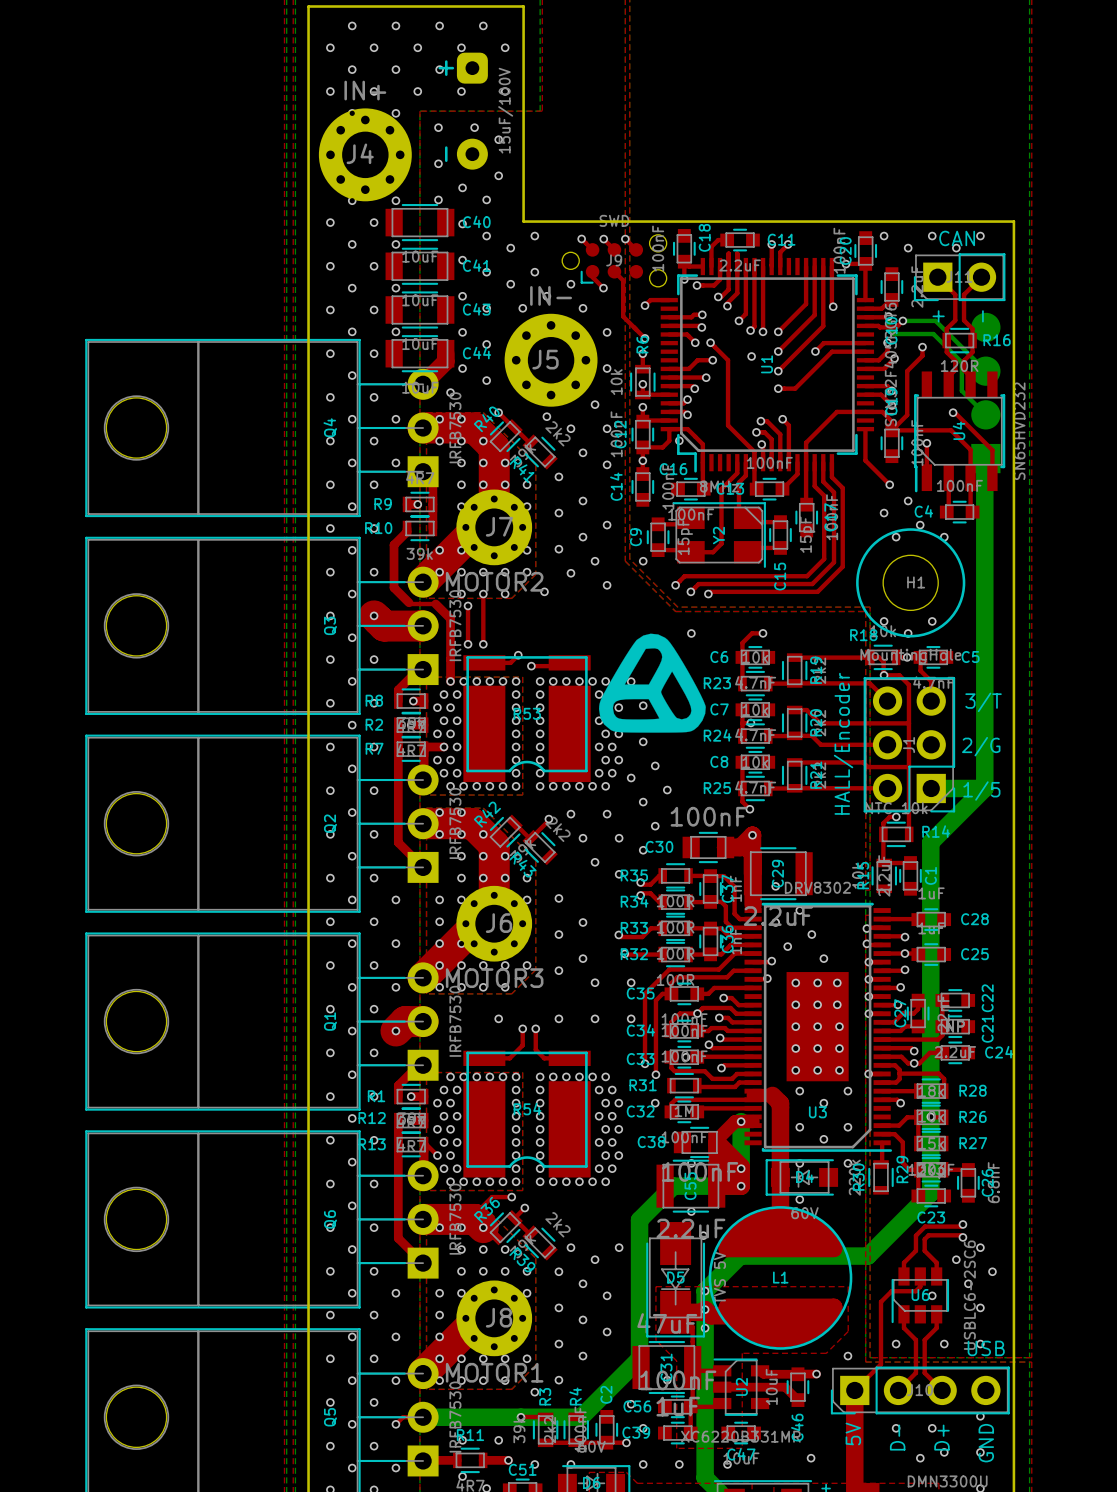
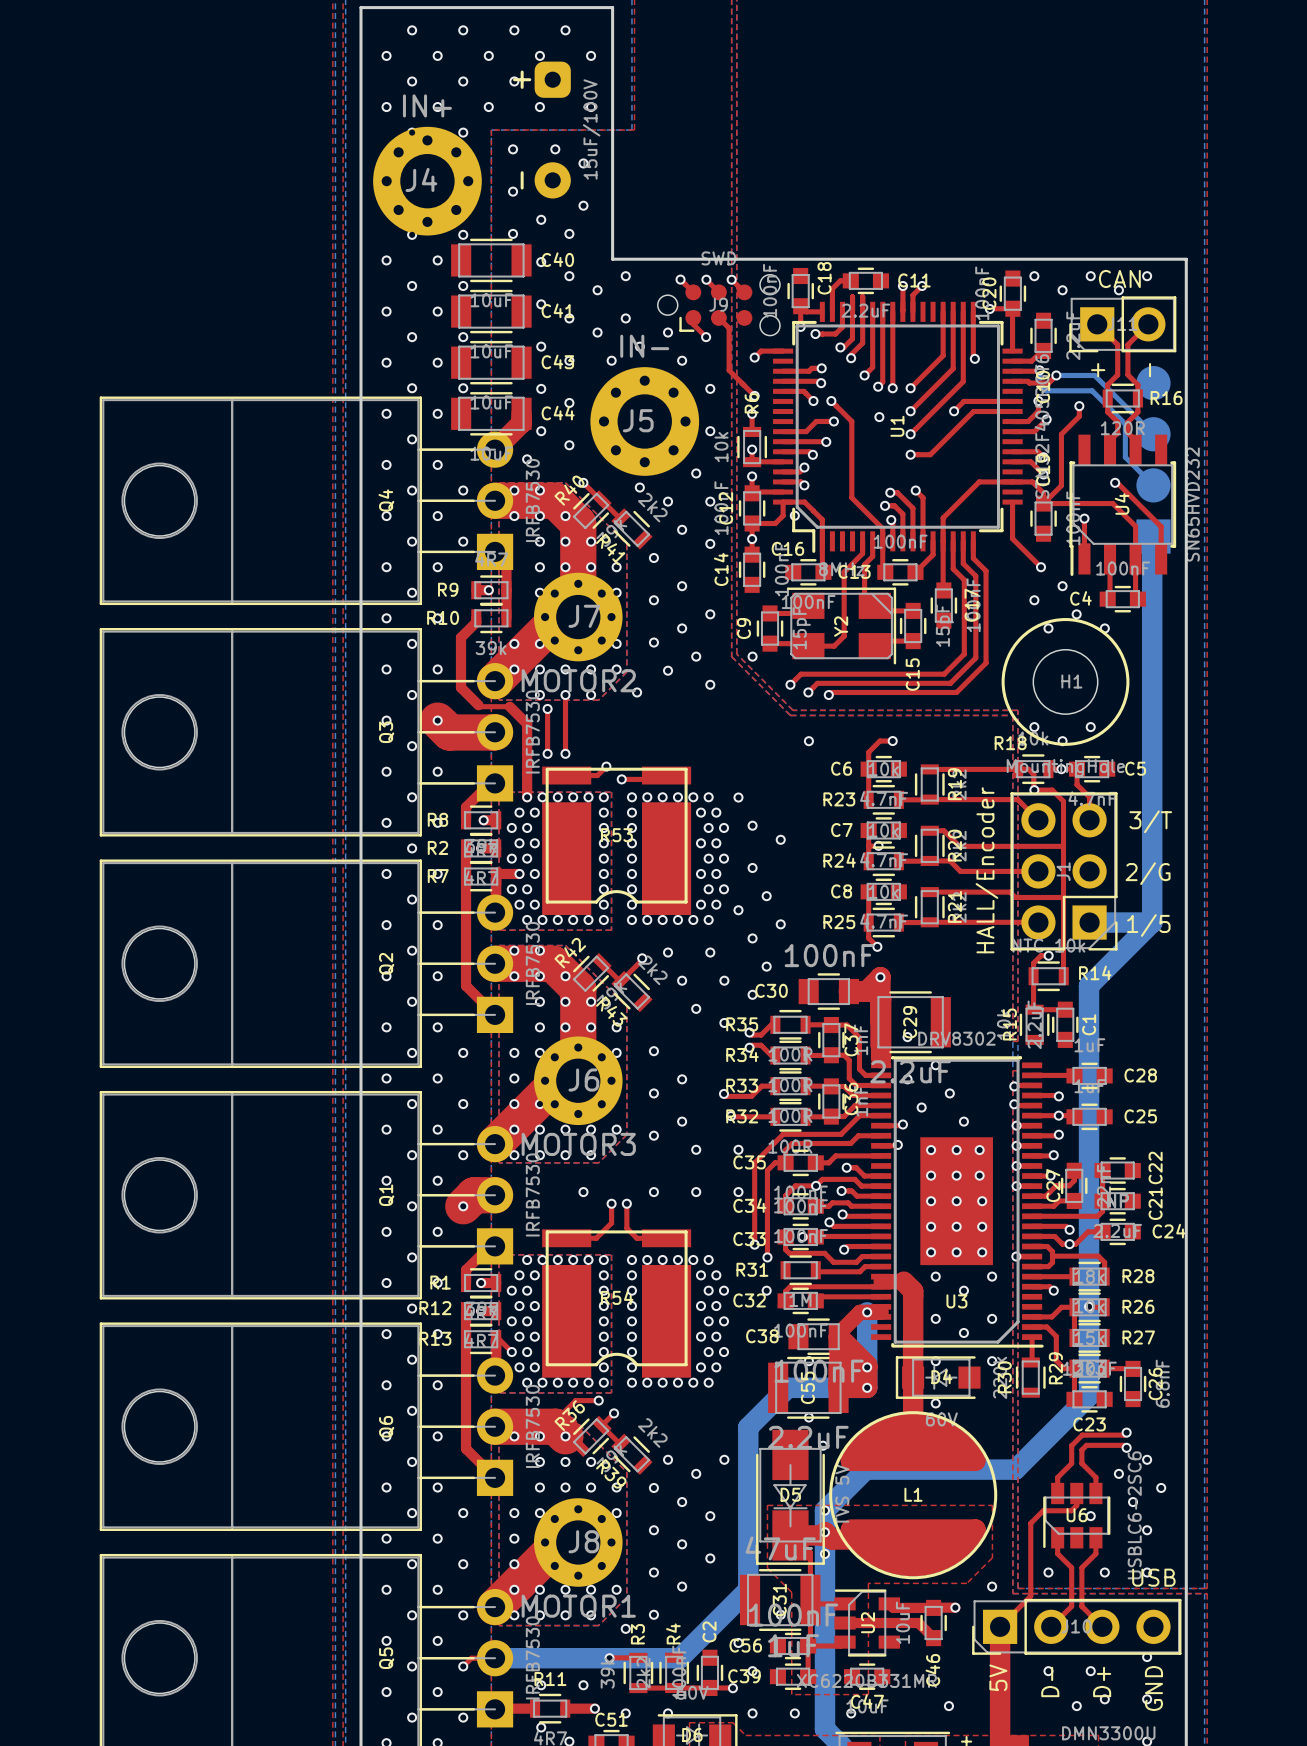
drawing: [599, 633, 706, 733] -> none

